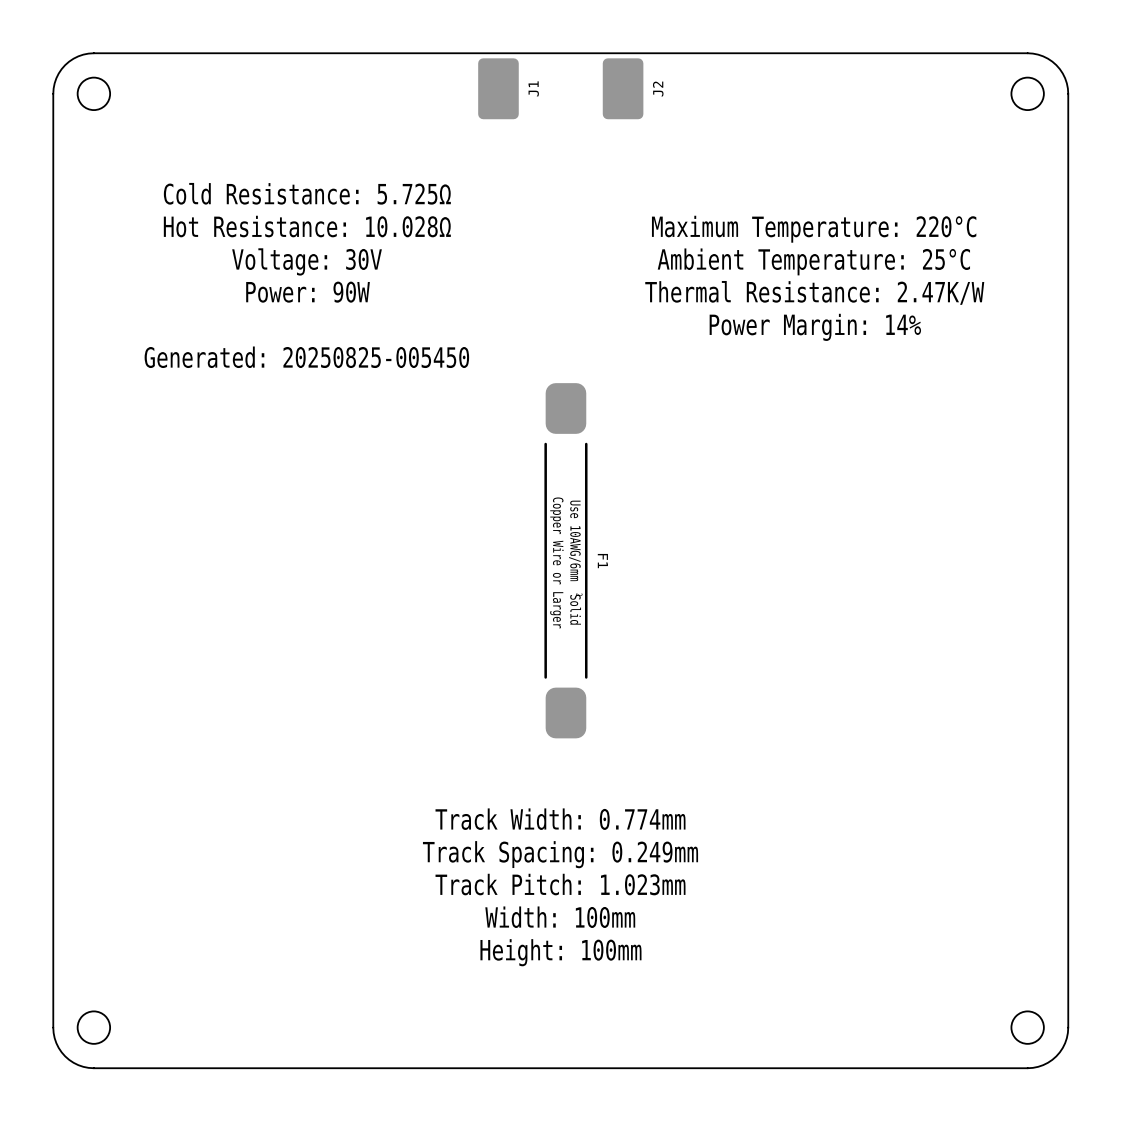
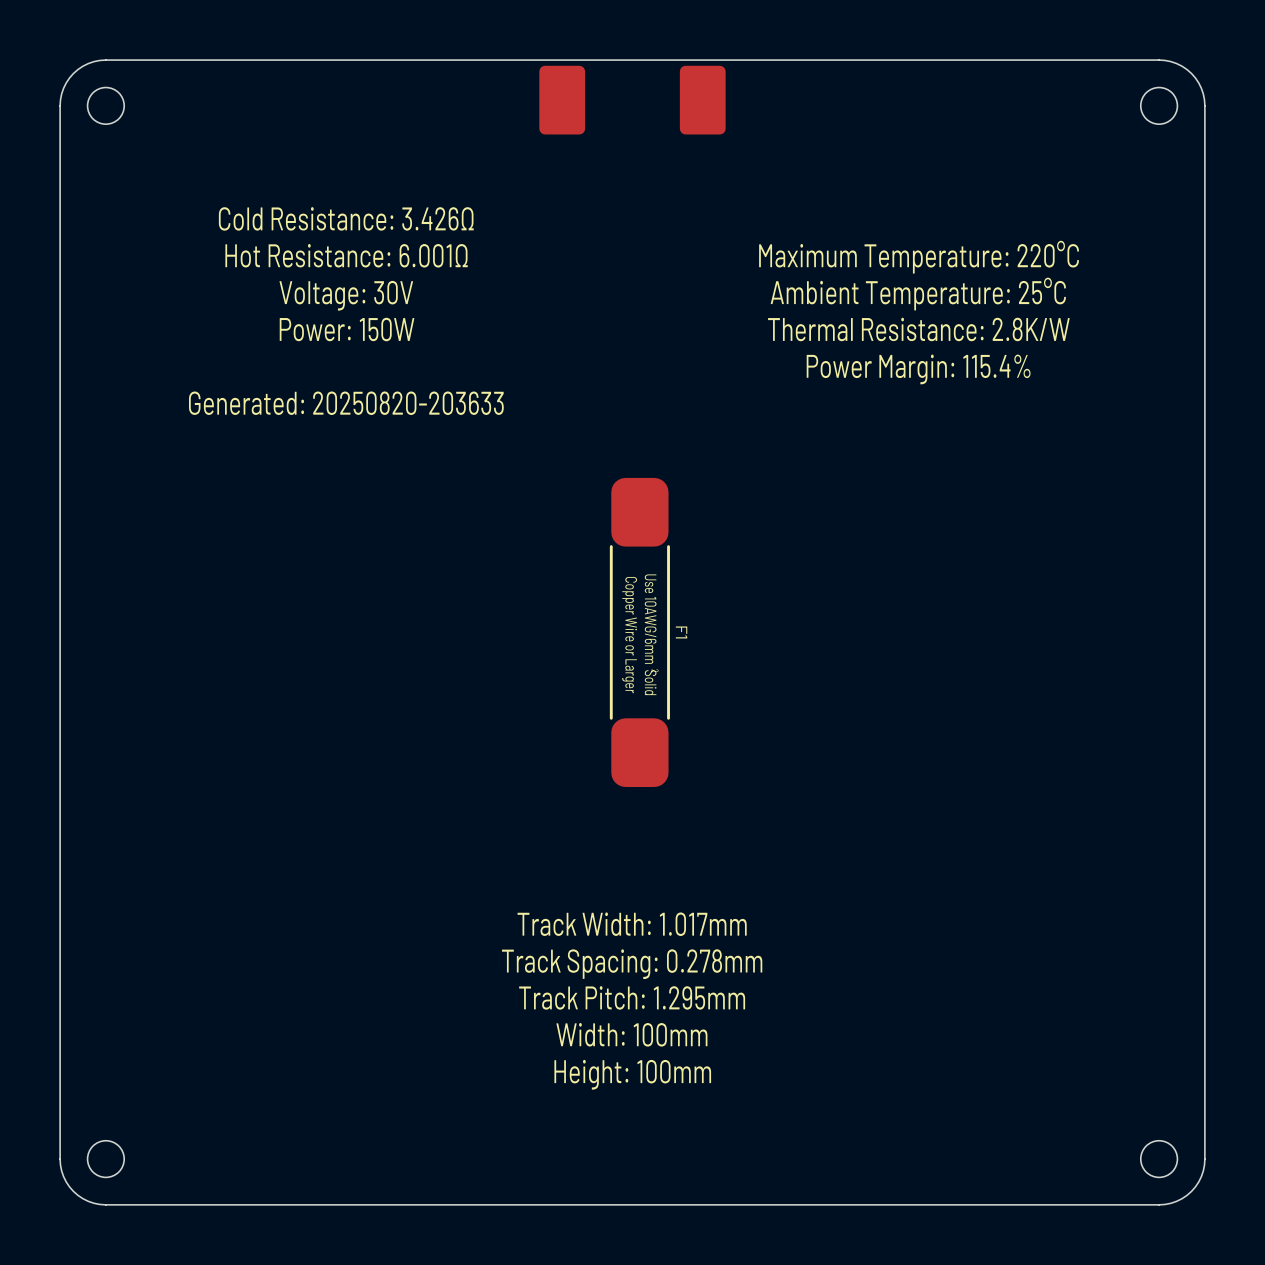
J1 name: J1 (533, 88) -> none
J2 name: J2 (658, 89) -> none
text: Cold Resistance: 5.725Ω (307, 193) -> Cold Resistance: 3.426Ω (346, 218)
text: Hot Resistance: 10.028Ω (307, 226) -> Hot Resistance: 6.001Ω (346, 255)
text: Power: 90W (308, 292) -> Power: 150W (347, 329)
text: Thermal Resistance: 2.47K/W (814, 292) -> Thermal Resistance: 2.8K/W (918, 329)
text: Power Margin: 14% (815, 327) -> Power Margin: 115.4% (918, 369)
text: Generated: 20250825-005450 (306, 357) -> Generated: 20250820-203633 (346, 403)
F1 footprint: [544, 383, 588, 739] -> [609, 477, 670, 788]
text: Track Width: 0.774mm (560, 819) -> Track Width: 1.017mm (632, 924)
text: Track Spacing: 0.249mm (560, 854) -> Track Spacing: 0.278mm (632, 964)
text: Track Pitch: 1.023mm (560, 884) -> Track Pitch: 1.295mm (632, 997)

